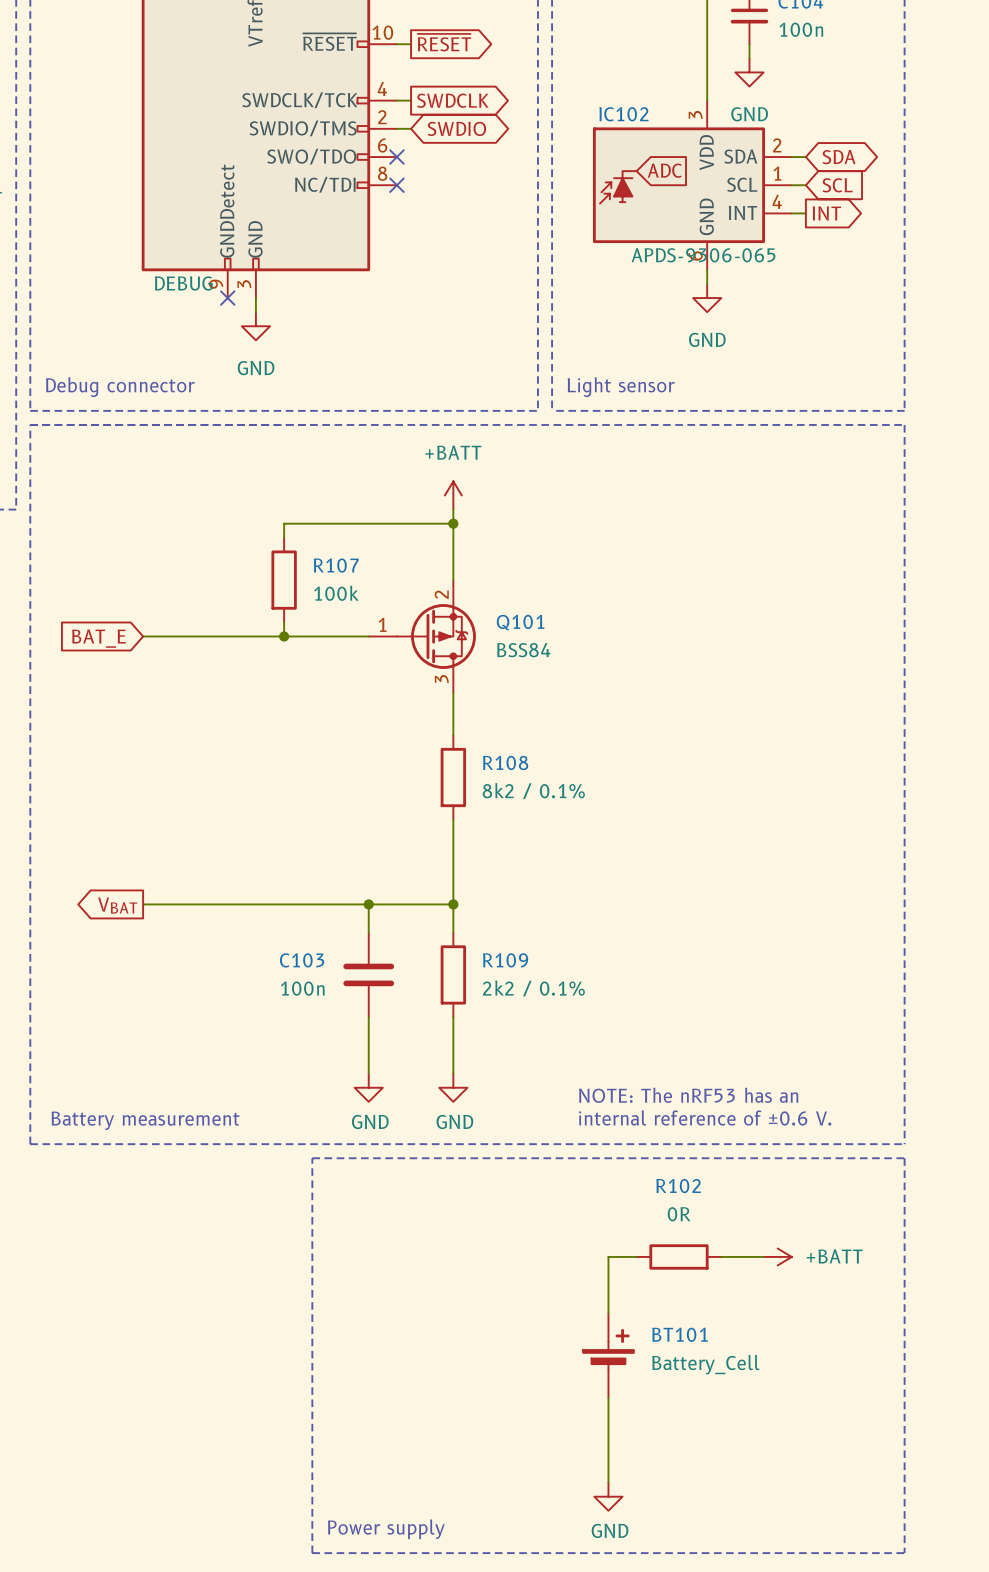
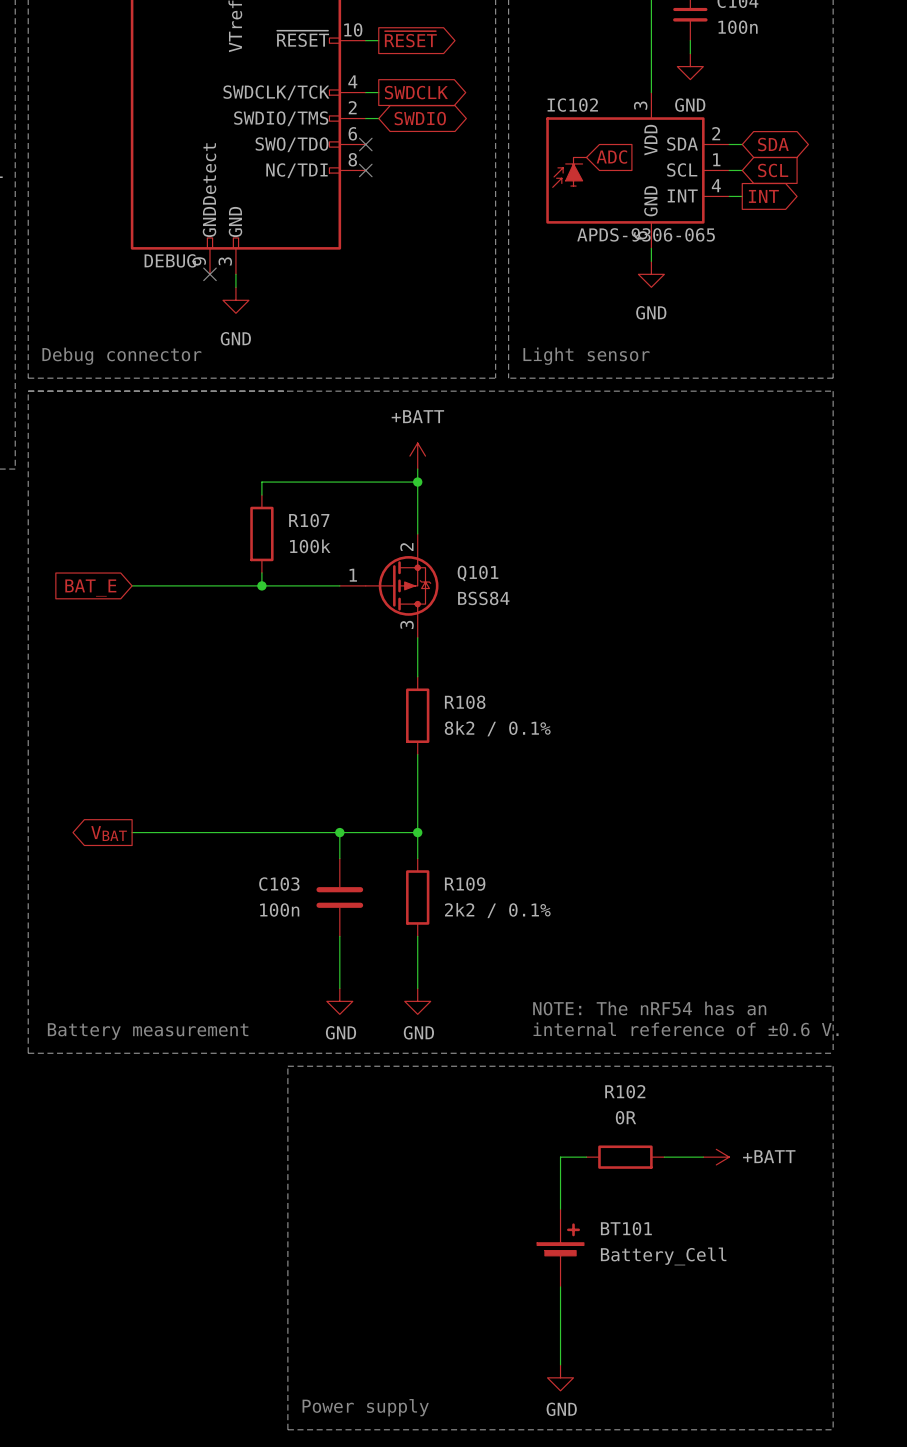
text: NOTE: The nRF53 has an (688, 1095) -> NOTE: The nRF54 has an (649, 1008)

